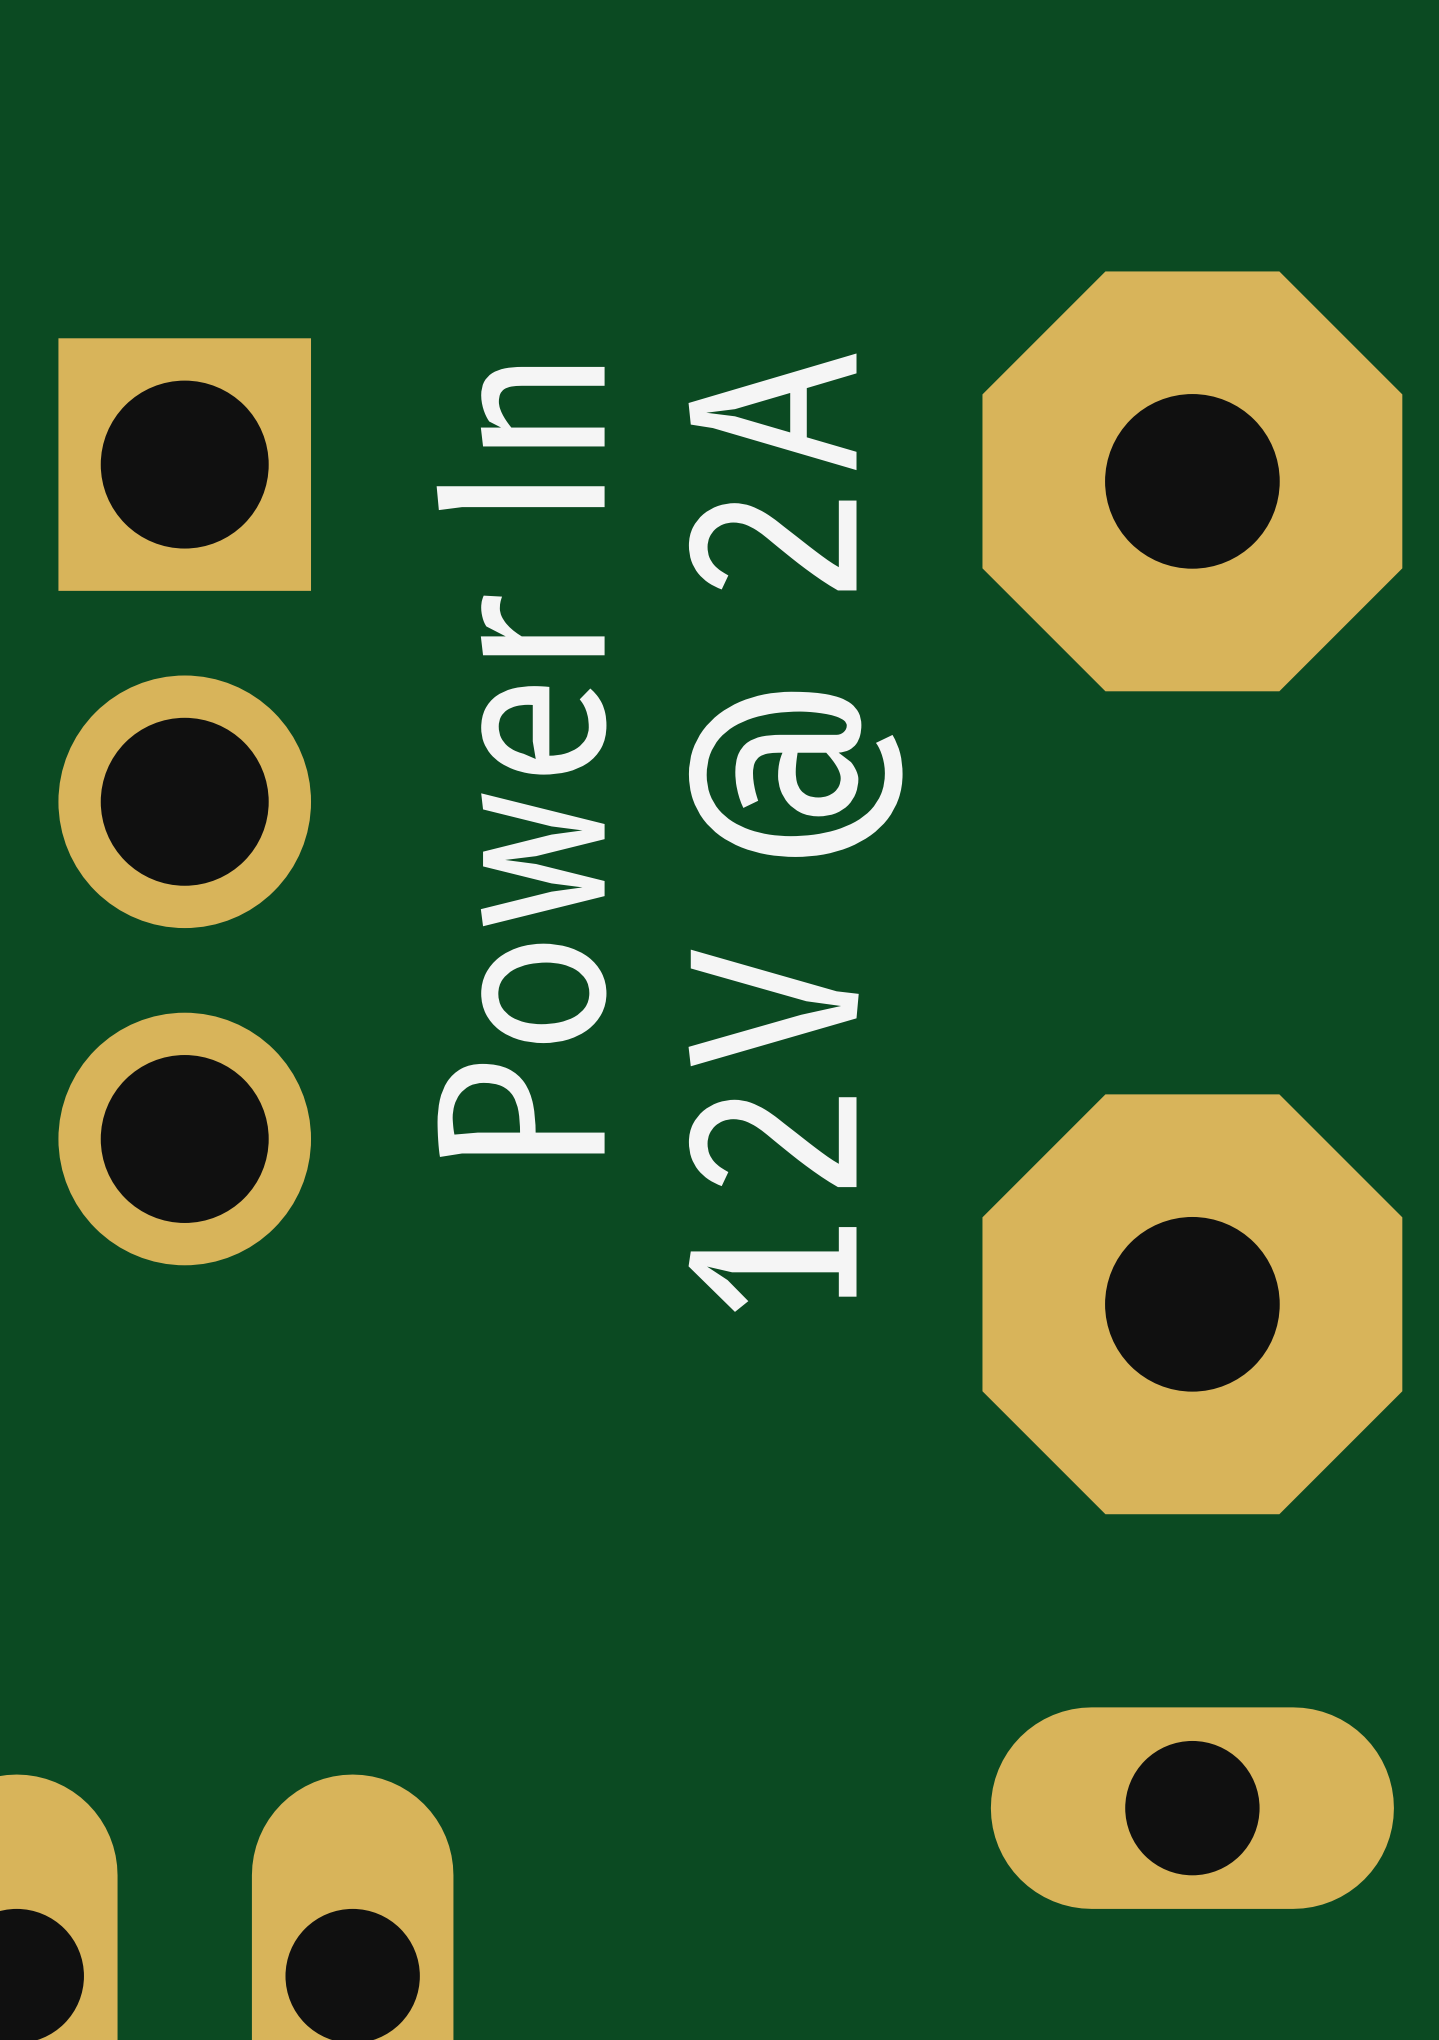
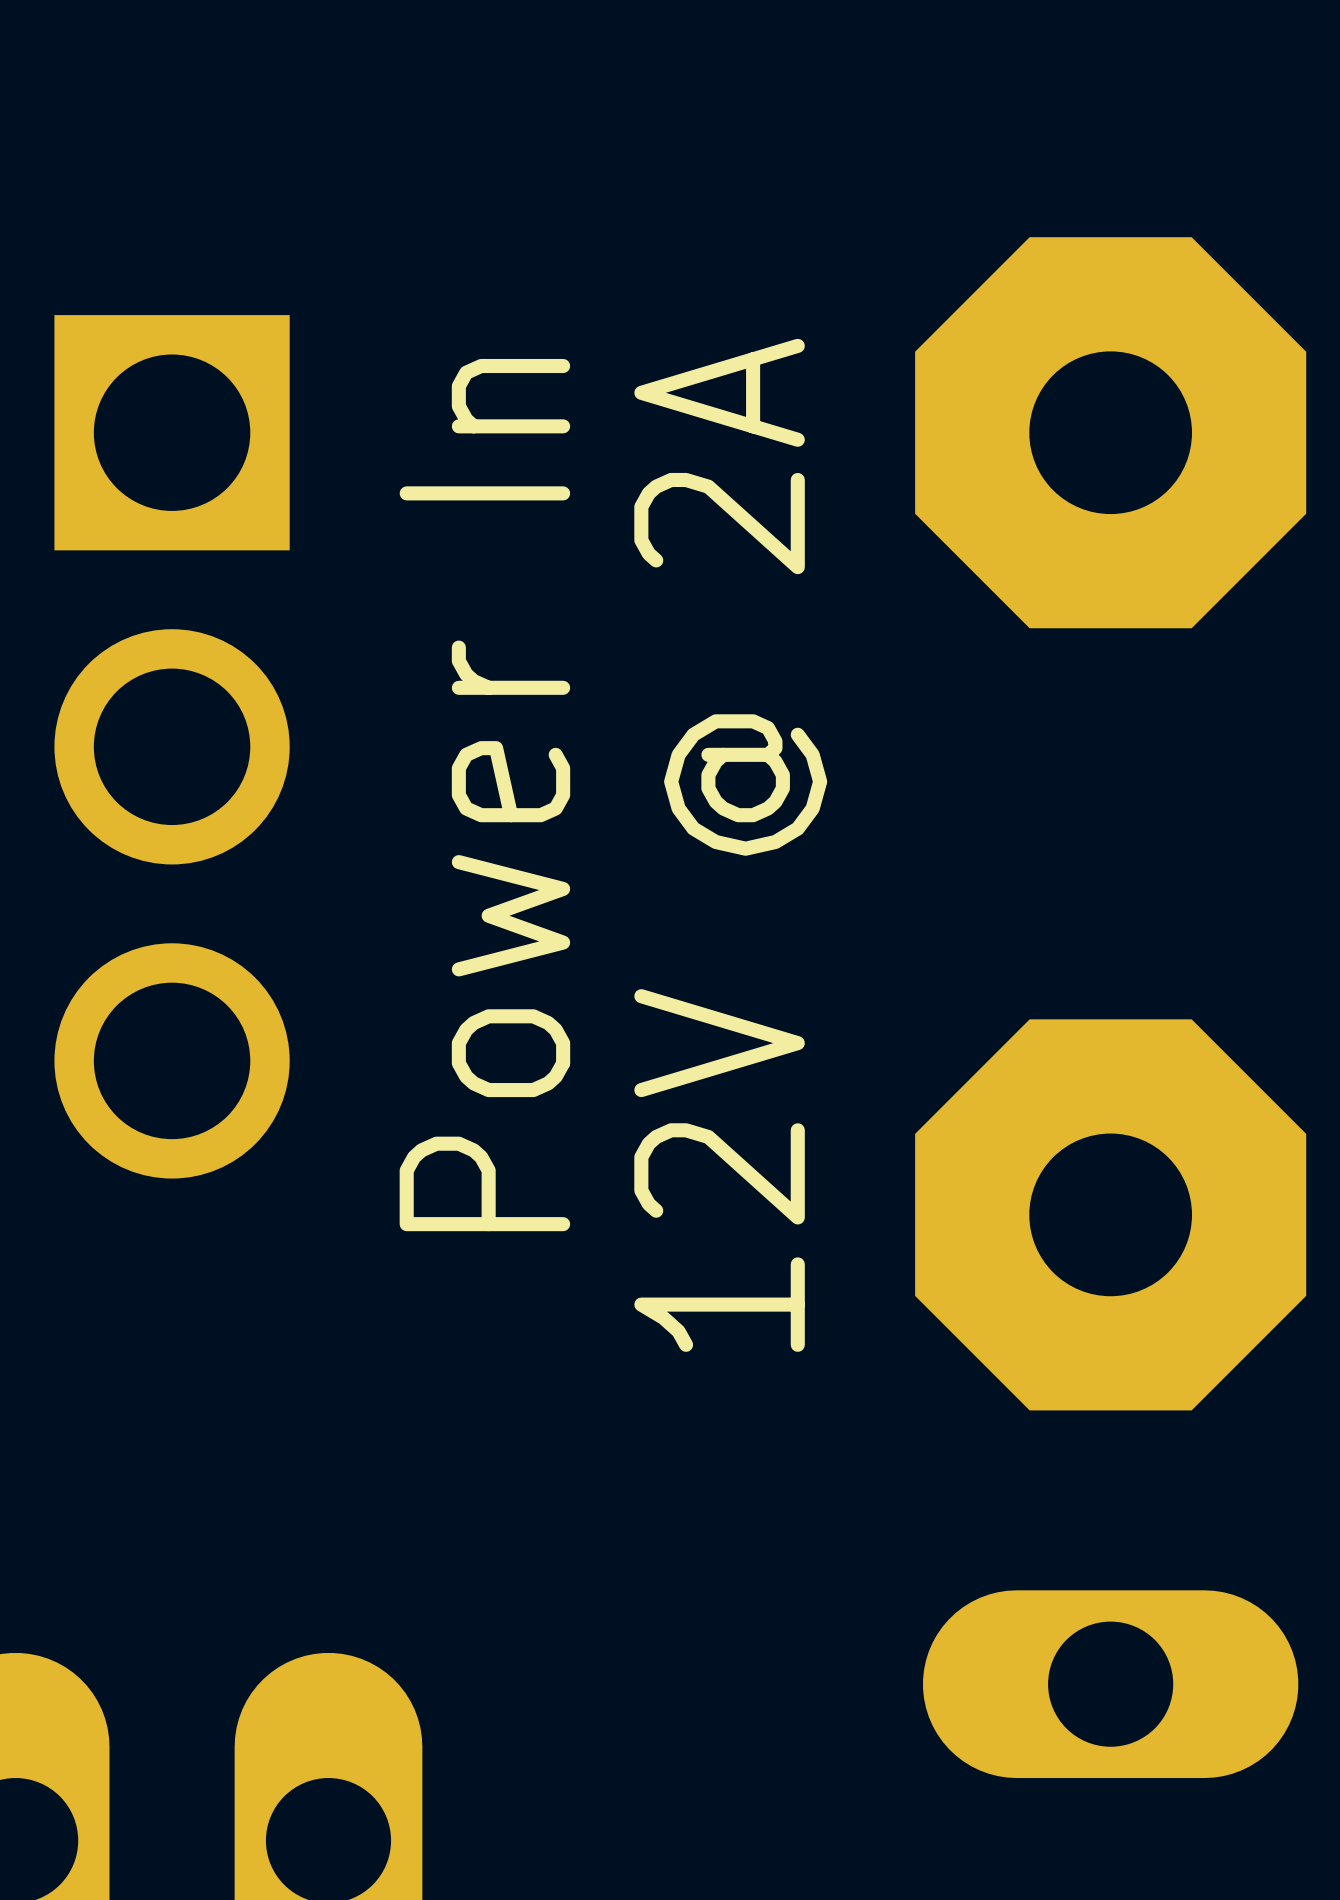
part position: (1192, 481) -> (1110, 432)

